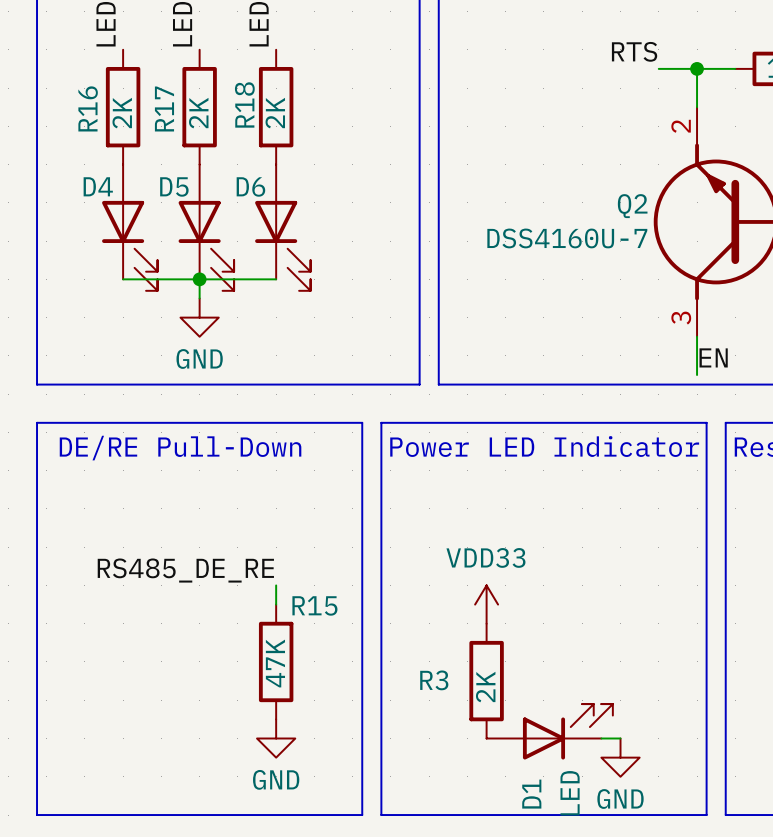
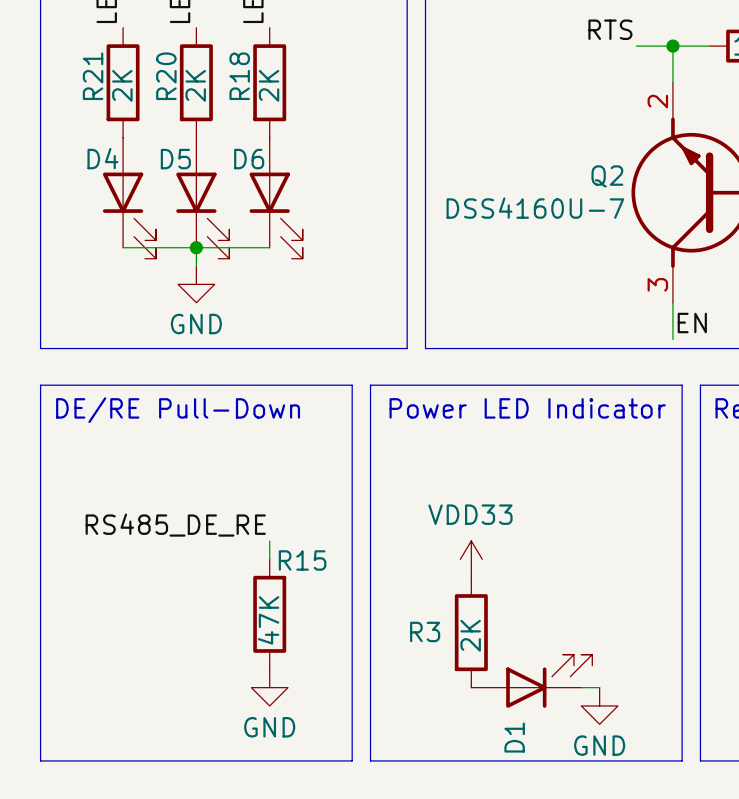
R16 name: R16 (88, 108) -> R21 (93, 76)
R17 name: R17 (164, 108) -> R20 (166, 76)
D1 value: LED (570, 793) -> none

